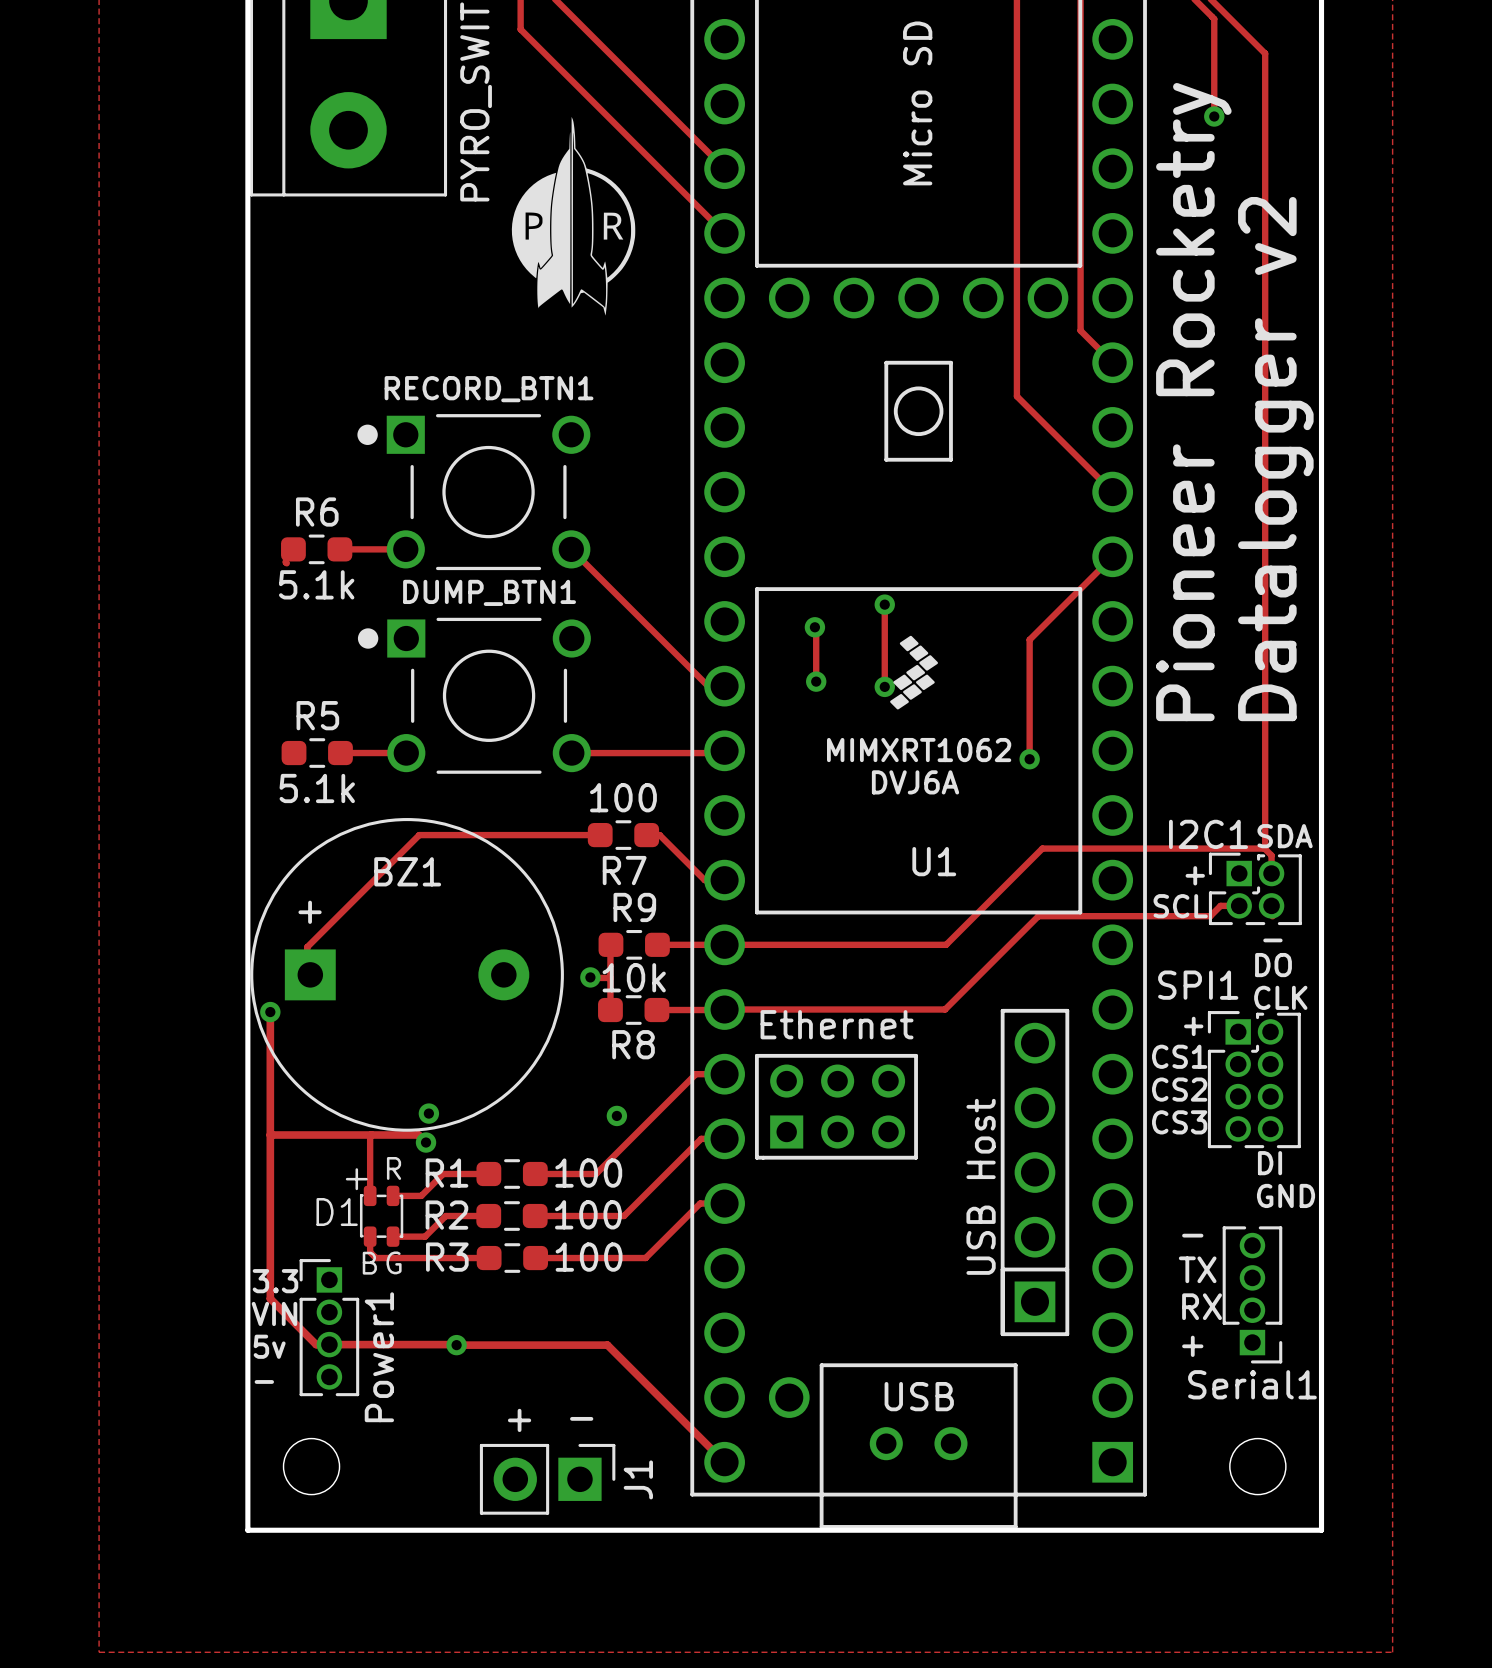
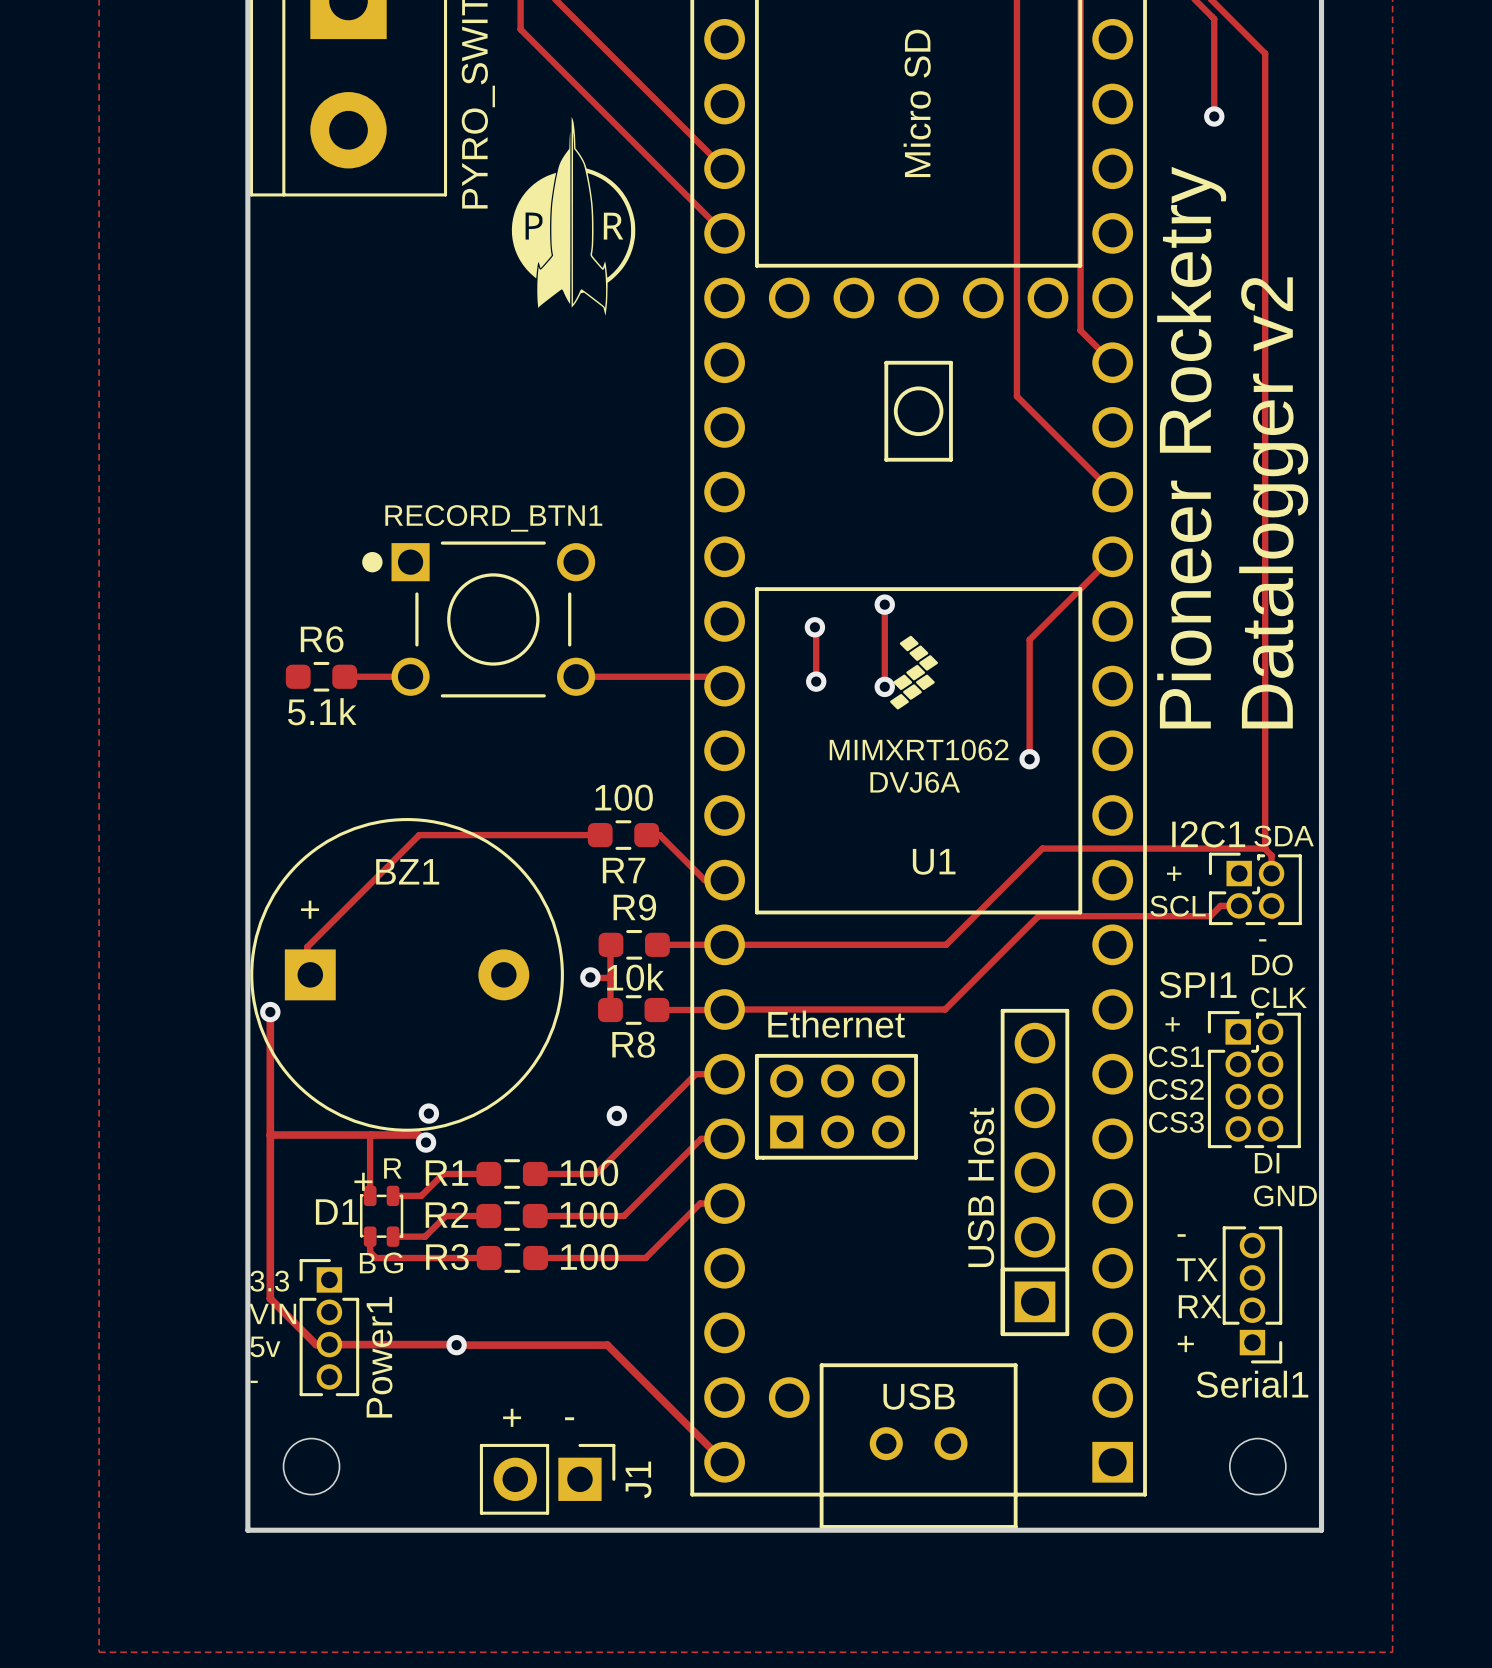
RECORD_BTN1 position: (473, 492) -> (478, 619)
R6 position: (316, 549) -> (321, 676)
track: (339, 549) (405, 549) -> none
track: (571, 549) (708, 686) -> none
track: (285, 562) (286, 563) -> none
track: none -> (576, 676) (715, 676) (724, 686)
DUMP_BTN1: (474, 695) -> none
R5: 5.1k (317, 753) -> none
track: (340, 753) (406, 753) -> (344, 676) (410, 676)
track: (571, 753) (722, 753) -> none

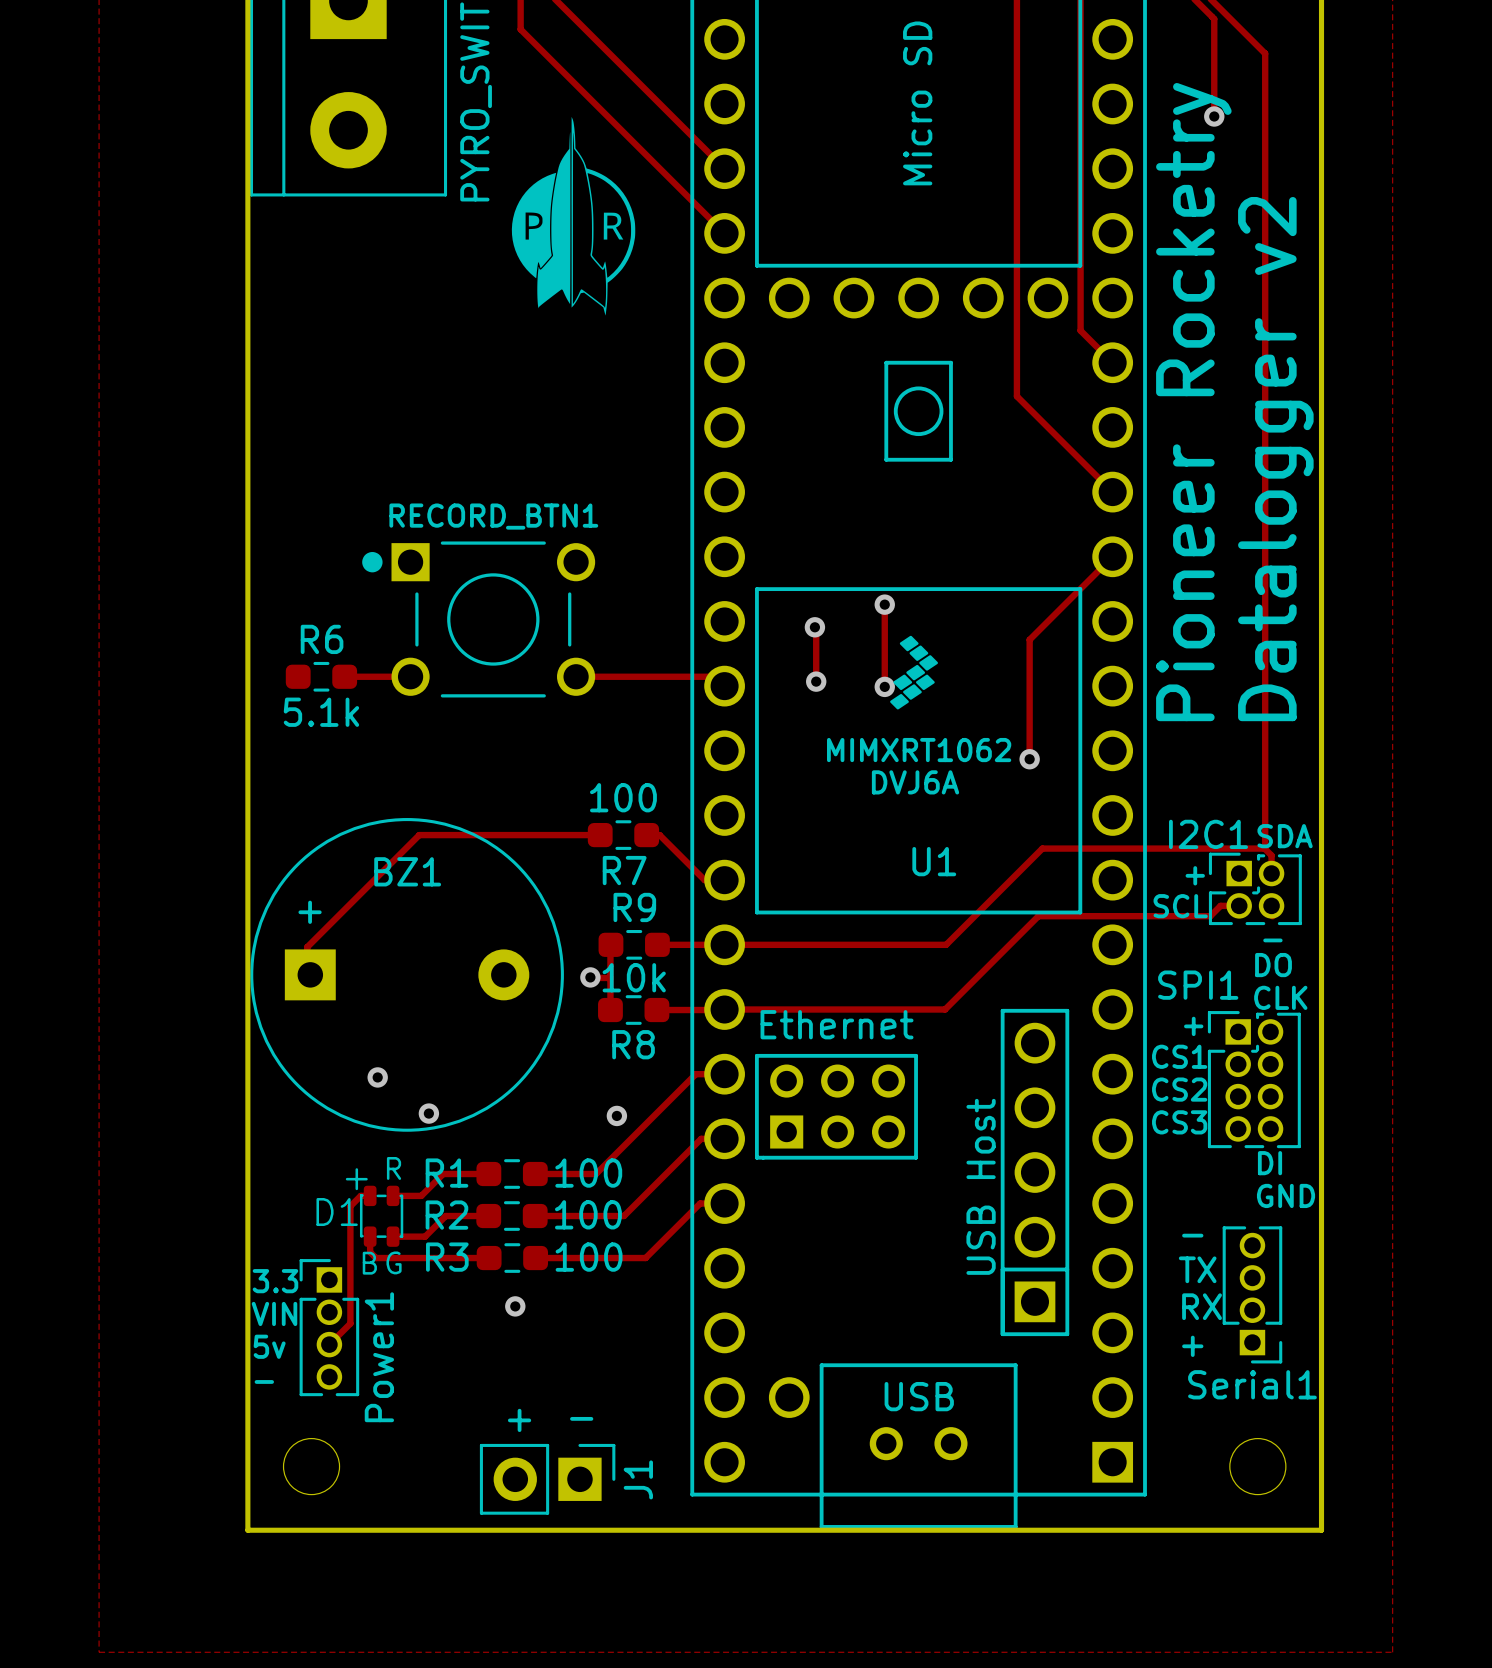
track: (270, 1012) (270, 1298) (316, 1344) (607, 1345) (724, 1462) -> none
via: (270, 1012) -> none
via: none -> (377, 1077)
track: (270, 1135) (418, 1135) (426, 1142) -> none
track: (371, 1135) (370, 1195) -> (329, 1344) (350, 1323) (350, 1206) (360, 1195) (370, 1195)
via: (426, 1142) -> none
via position: (456, 1345) -> (515, 1306)

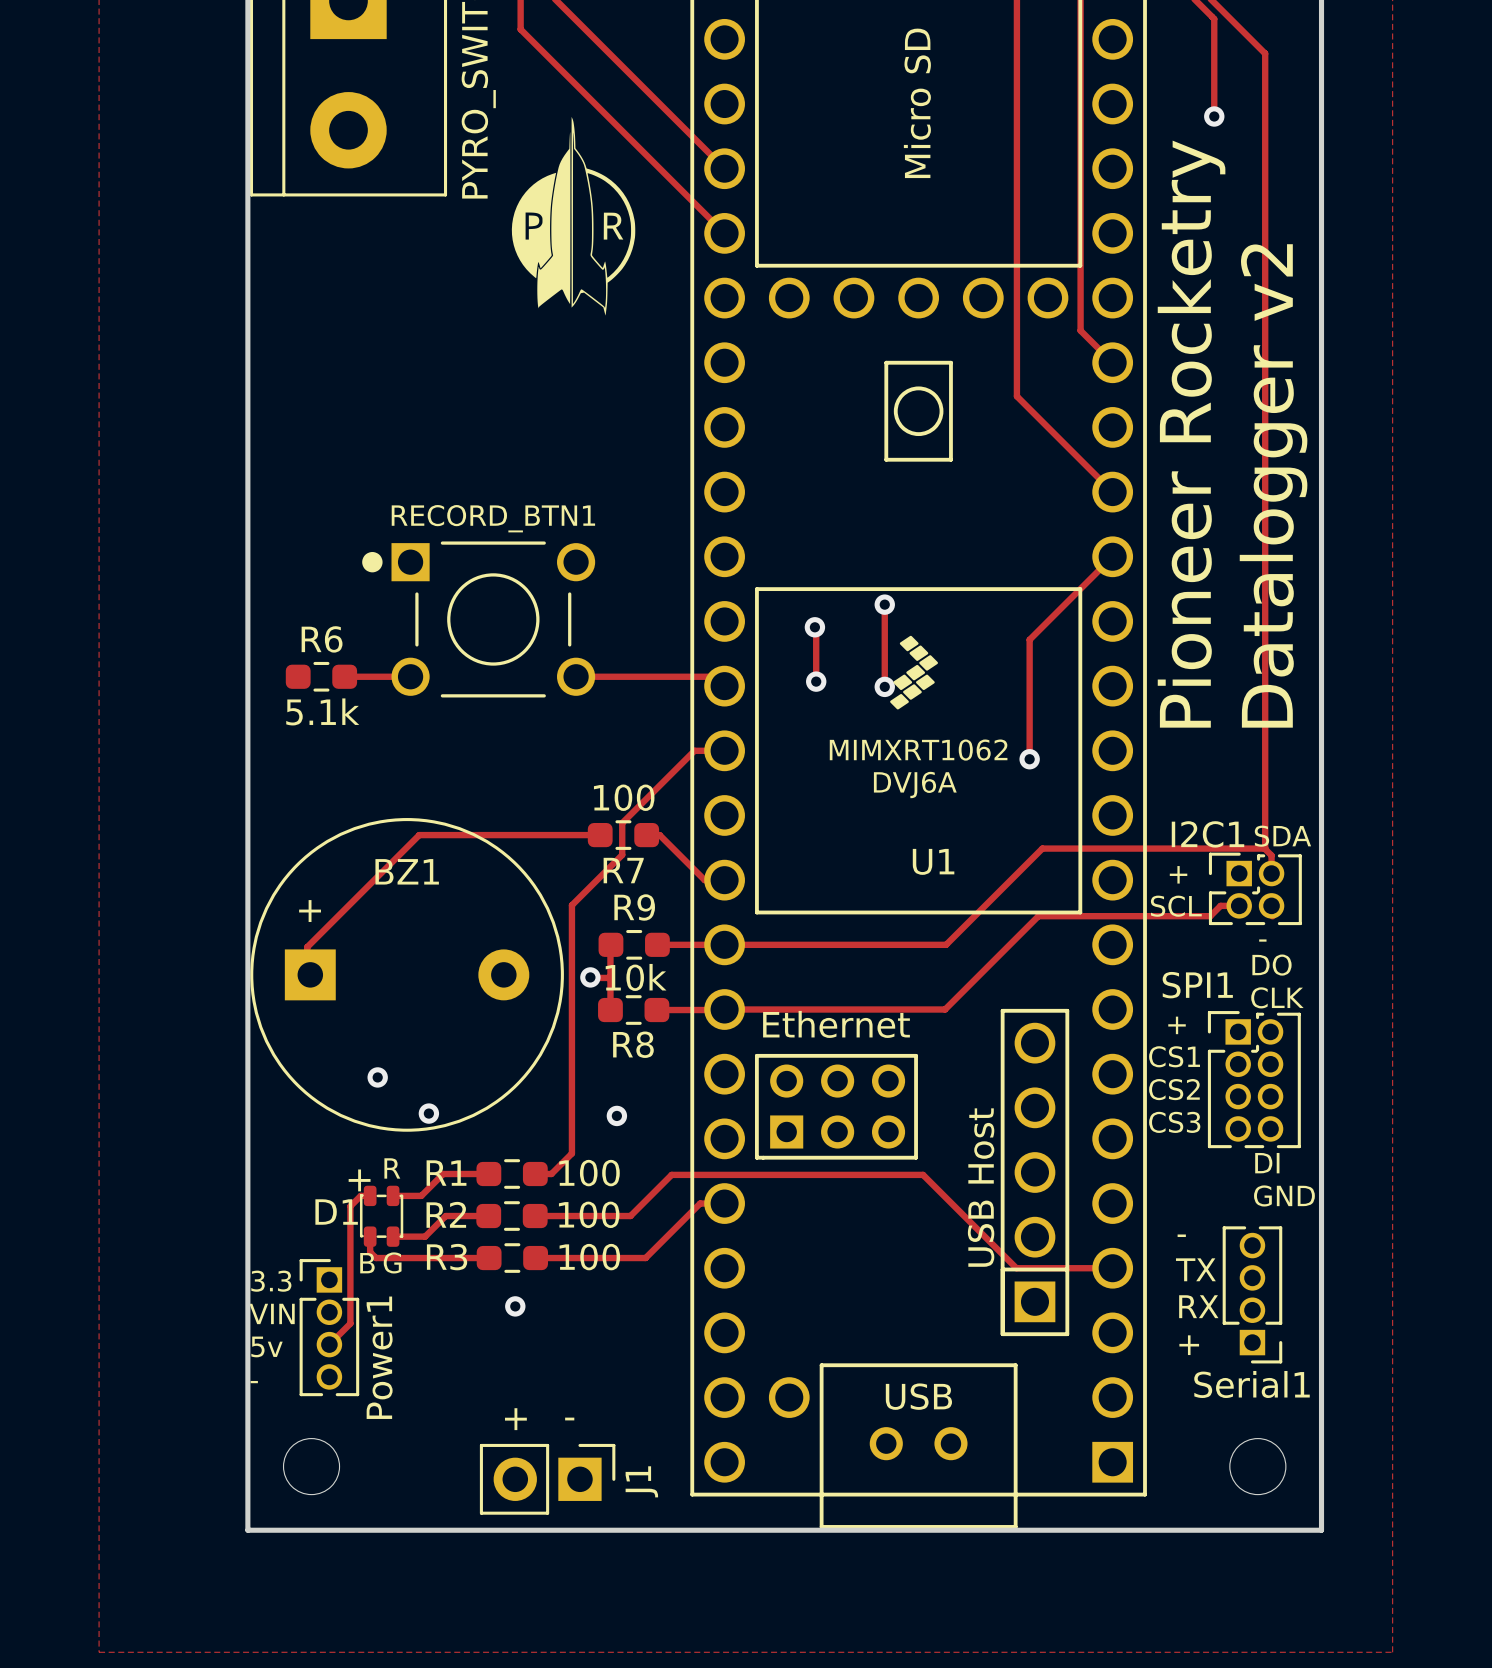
track: (724, 1074) (695, 1074) (596, 1174) (551, 1174) -> (724, 750) (694, 750) (622, 823) (622, 854) (571, 905) (571, 1153) (551, 1174)
track: (724, 1138) (701, 1138) (624, 1216) -> (1112, 1268) (1016, 1268) (923, 1174) (671, 1174) (630, 1216) (624, 1216)

